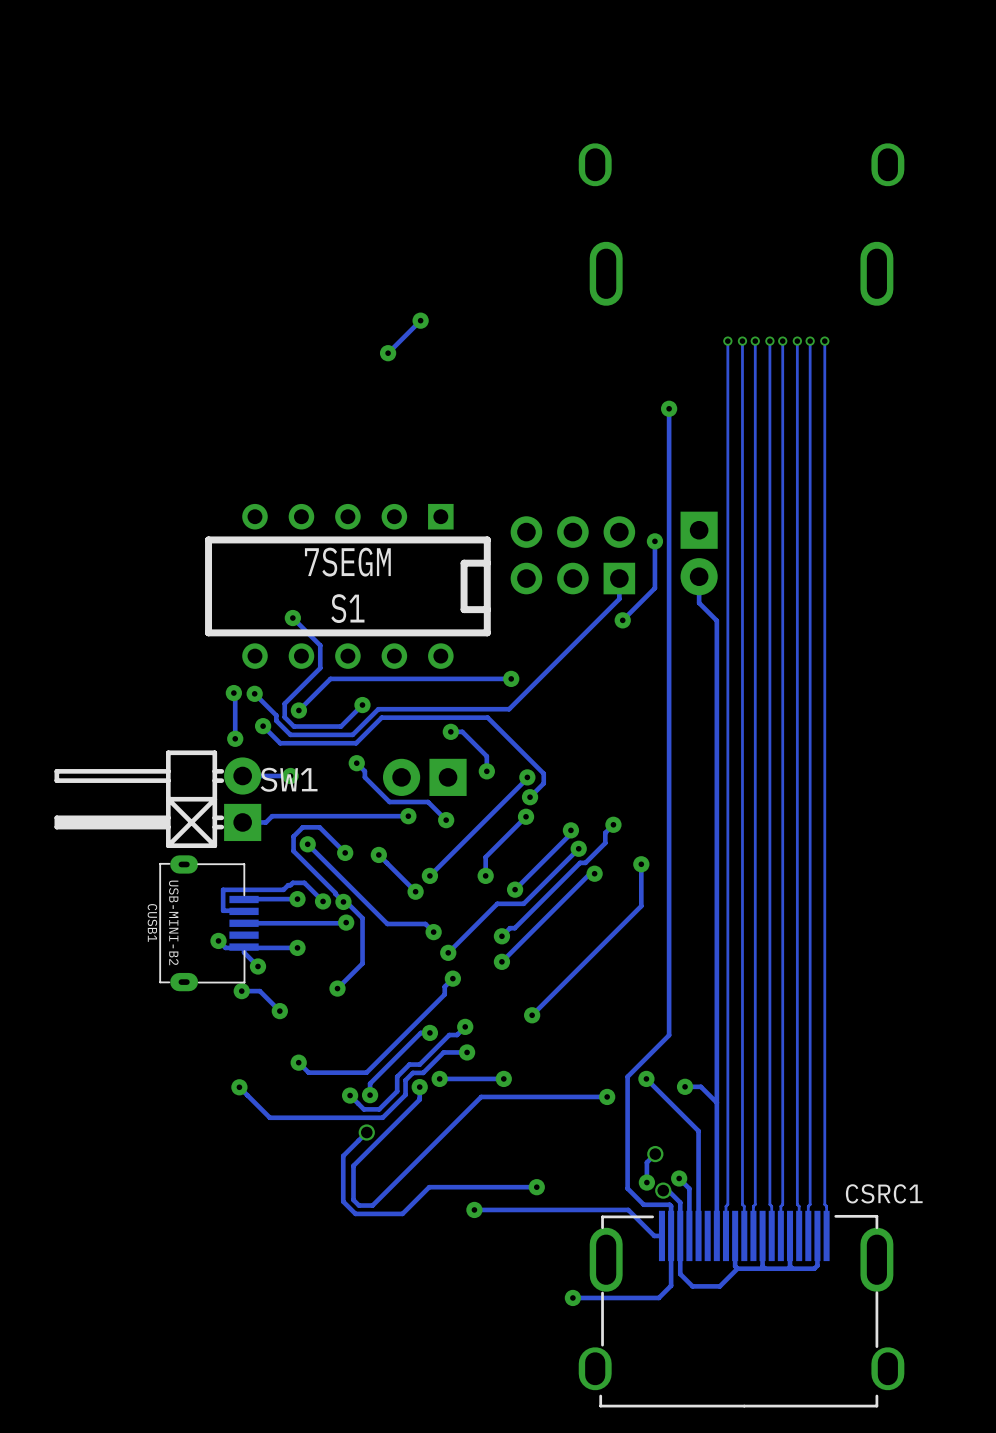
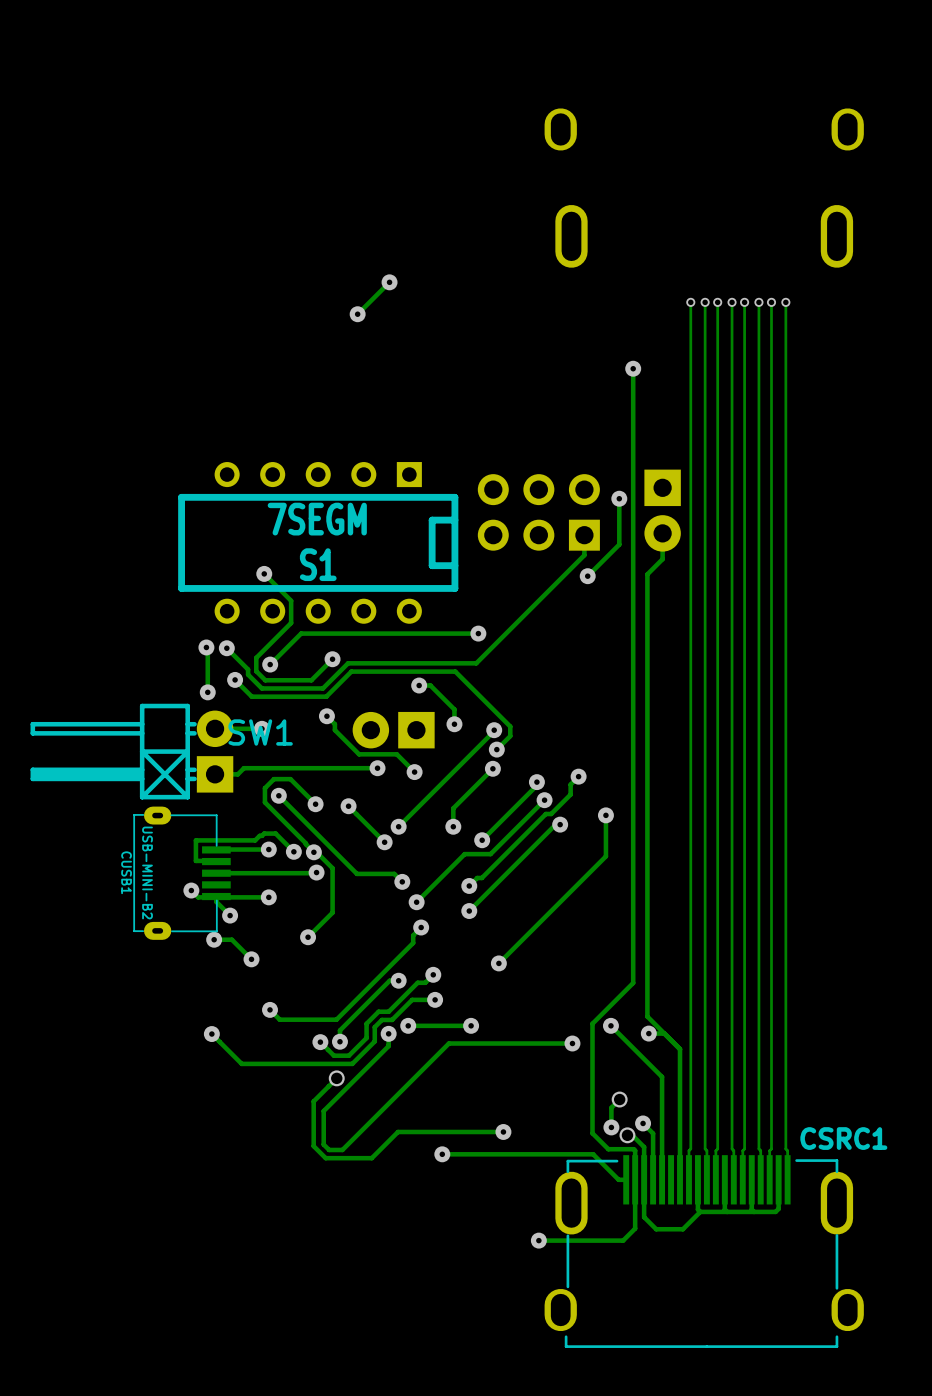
track: (699, 602) (716, 620) (716, 1102) -> (662, 559) (647, 574) (647, 1016) (664, 1033)

